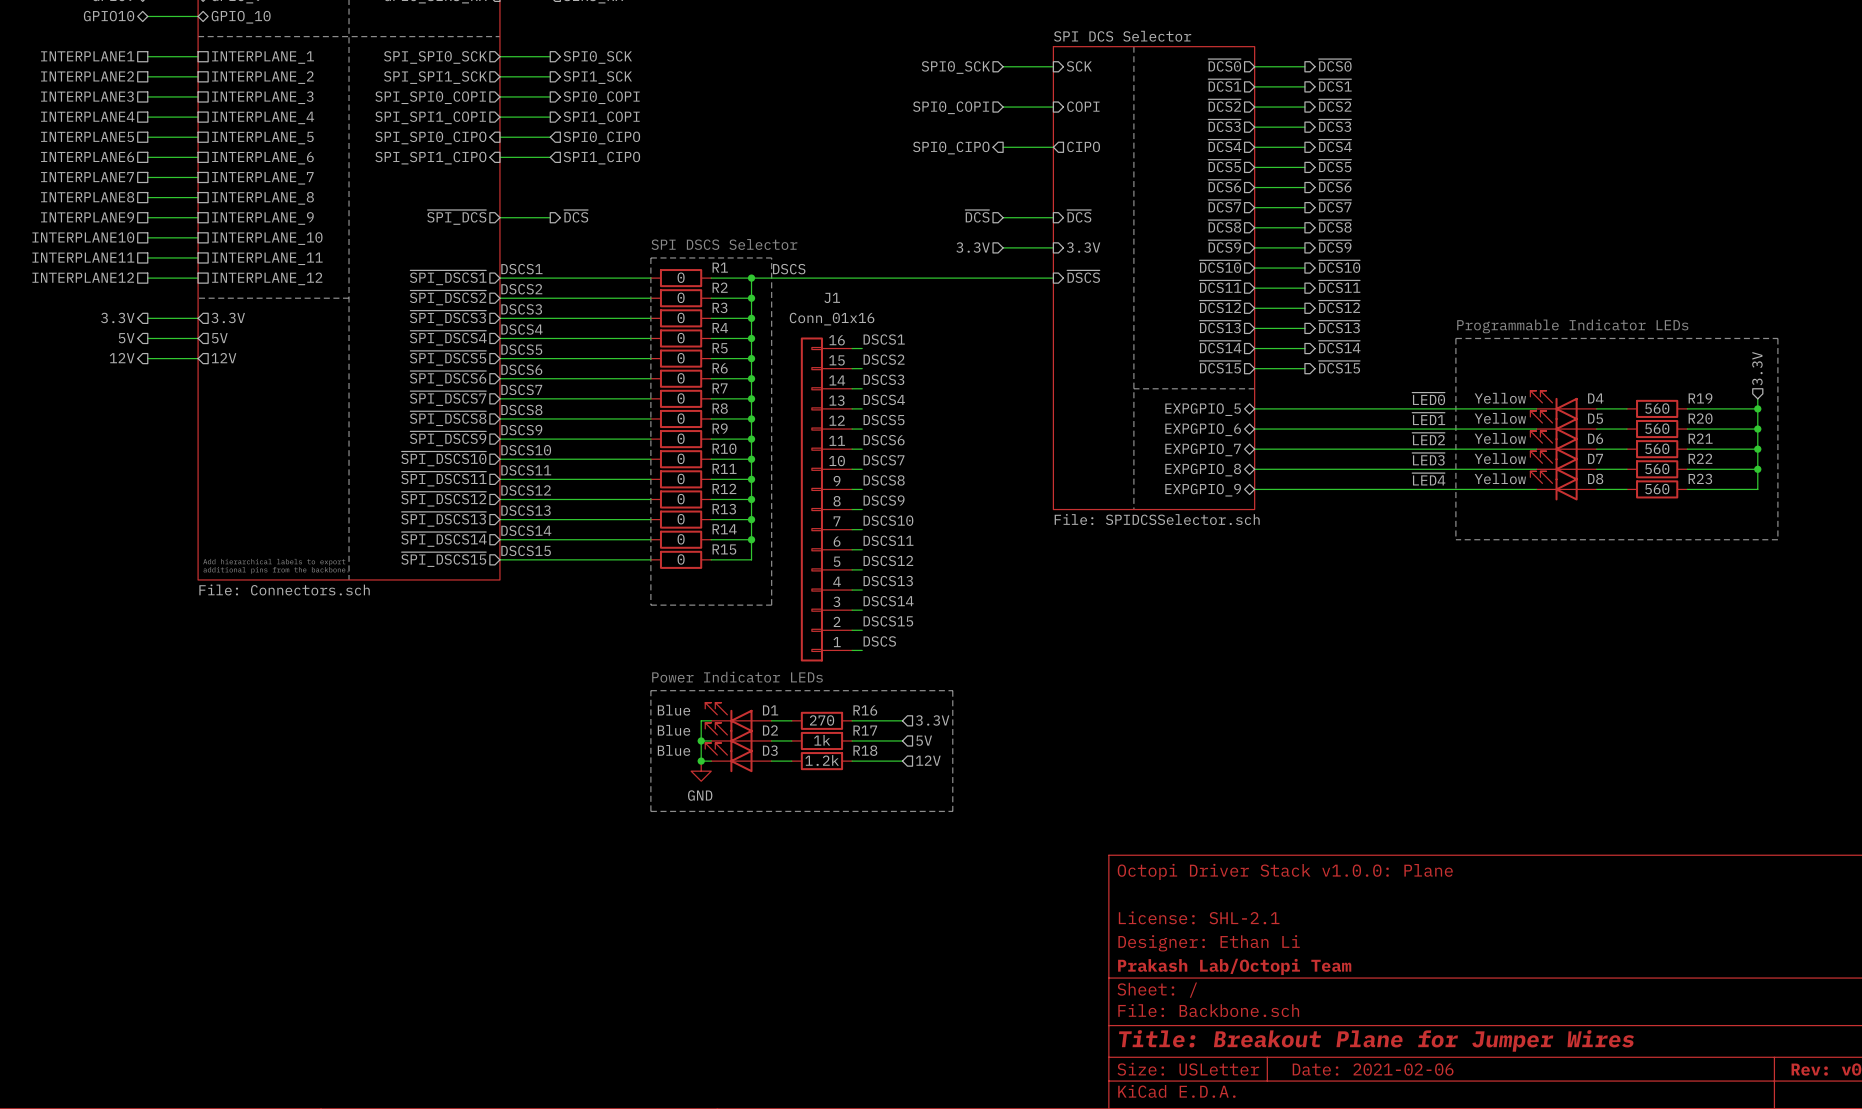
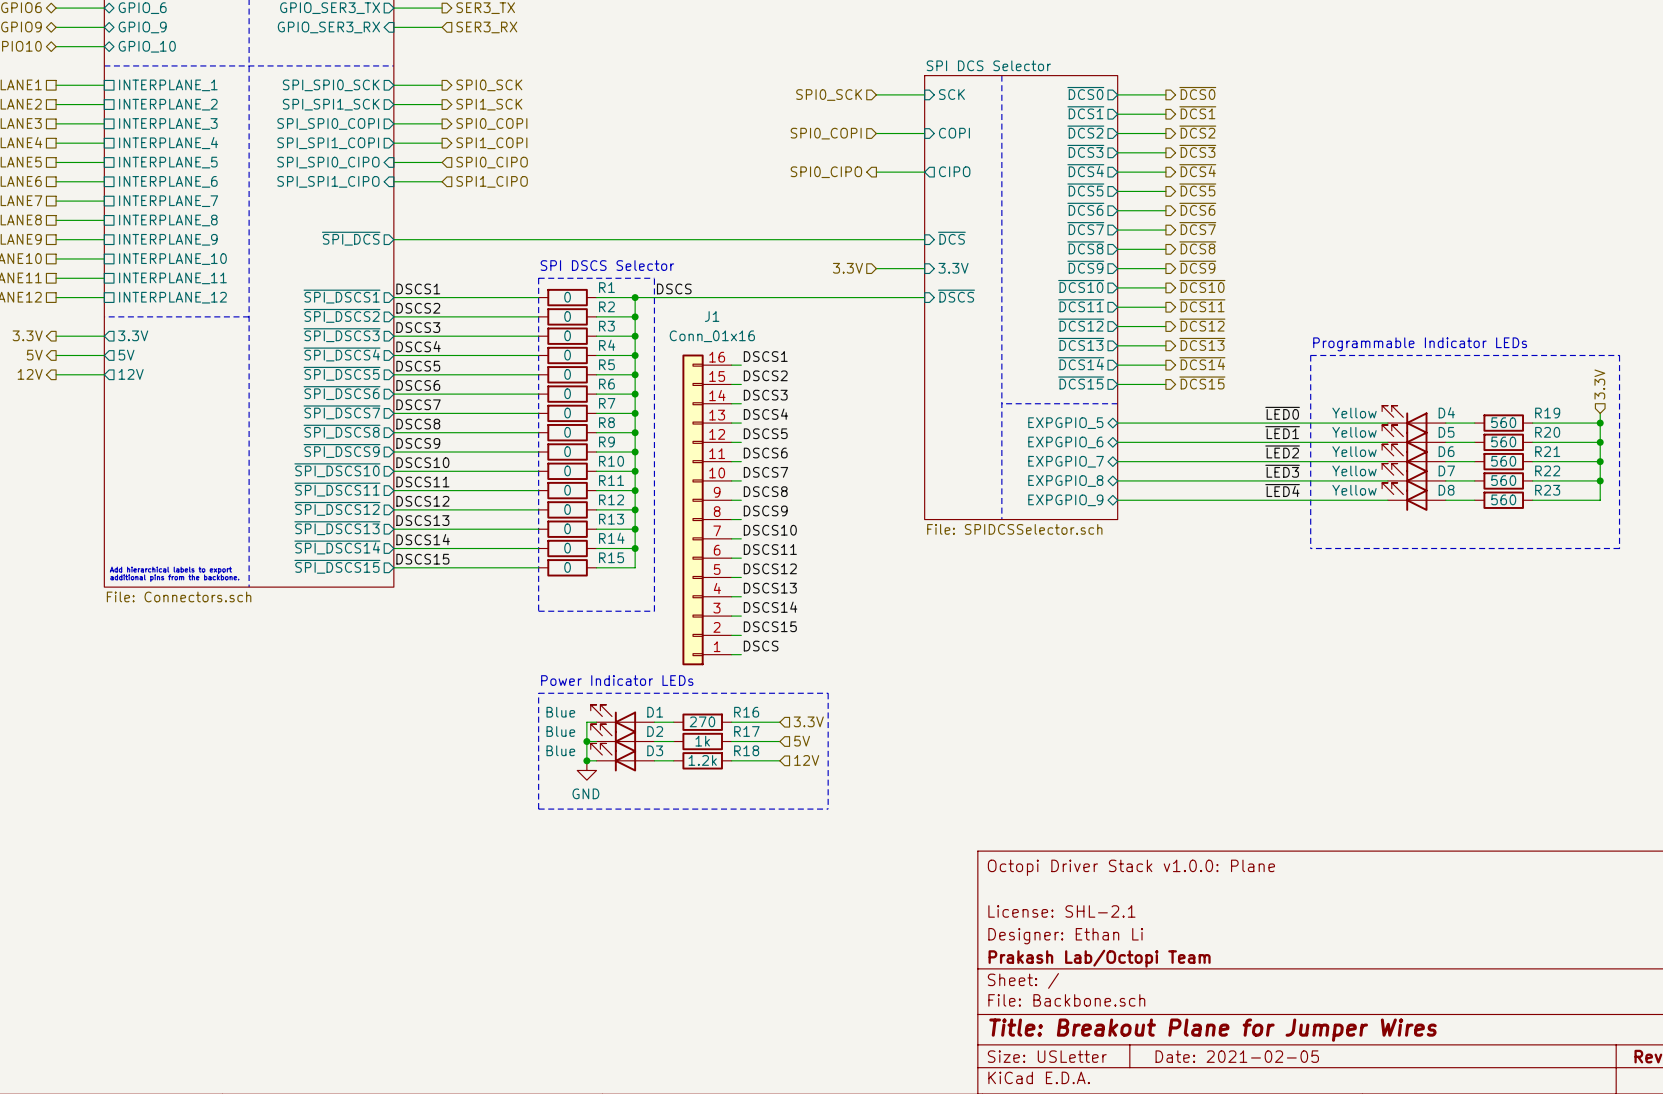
hierarchical label: ~{DCS} (576, 216) -> none
hierarchical label: ~{DCS} (977, 216) -> none
wire: none -> (442, 239) (876, 239)
title block: Date: 2021-02-06 (1373, 1069) -> Date: 2021-02-05 (1237, 1056)

